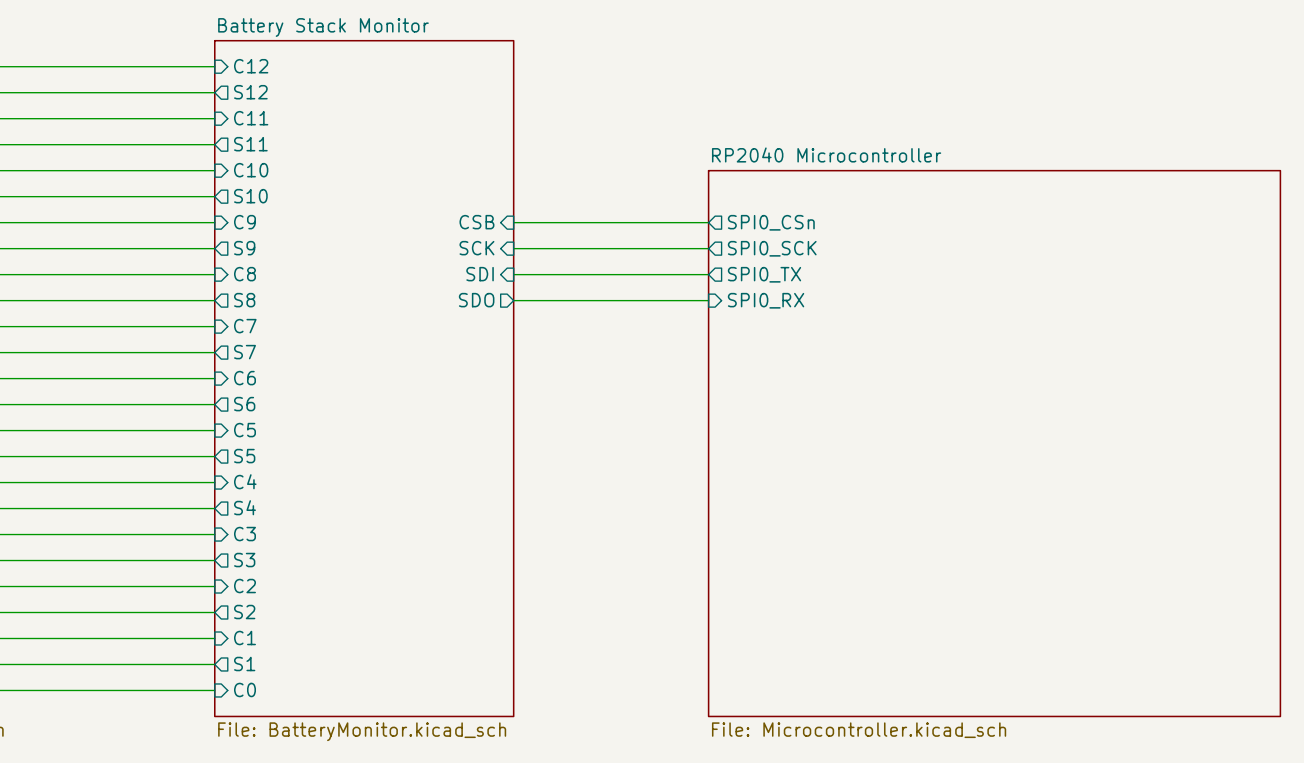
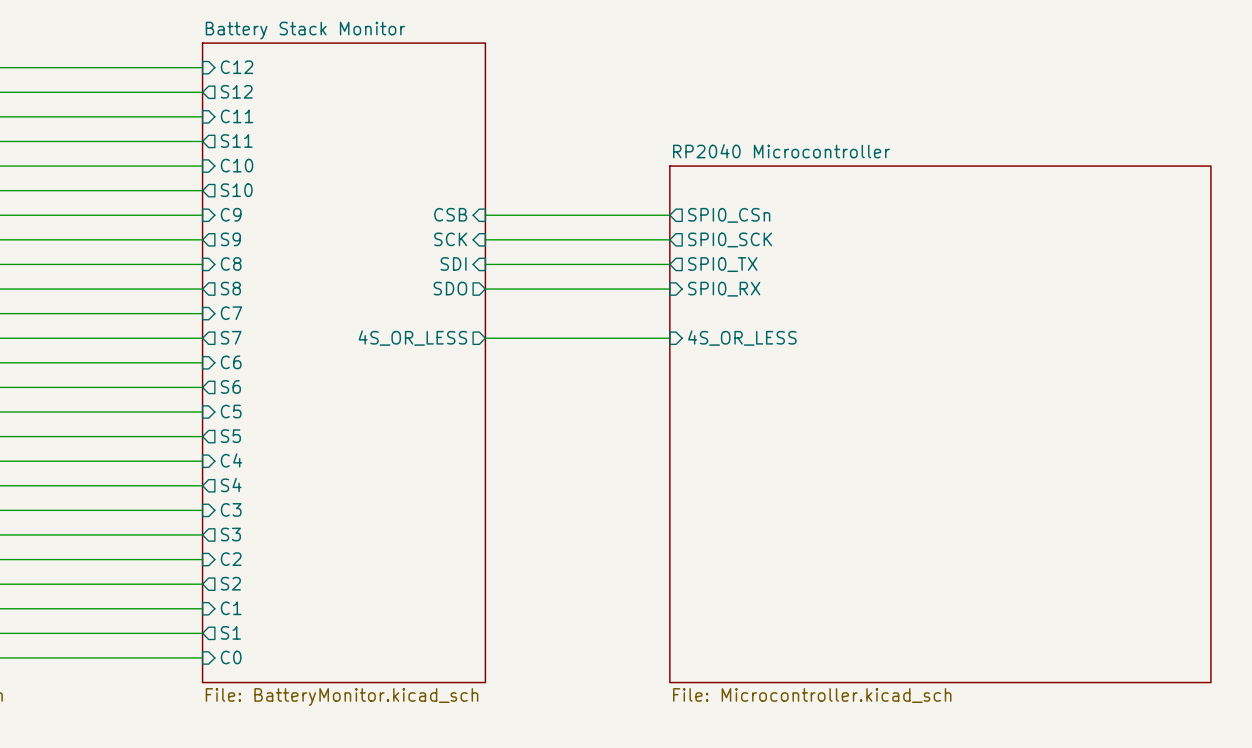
sheet pin: none -> 4S_OR_LESS (412, 338)
wire: none -> (485, 338) (669, 338)
sheet pin: none -> 4S_OR_LESS (742, 338)

